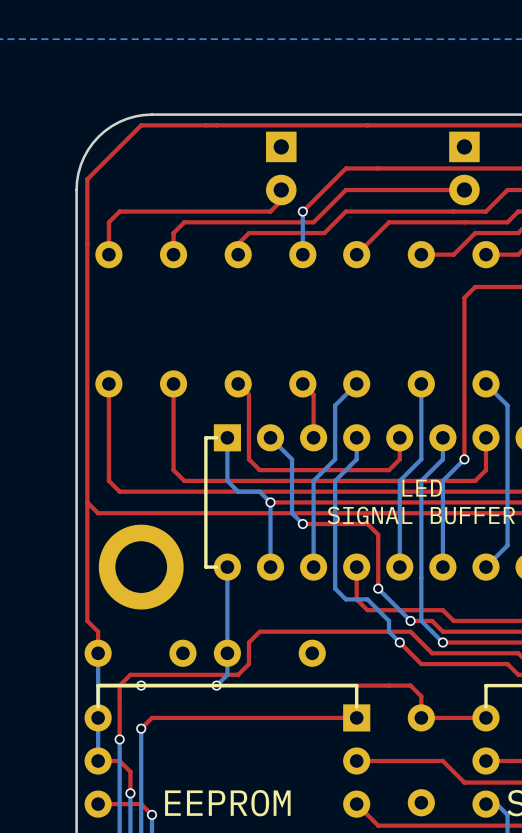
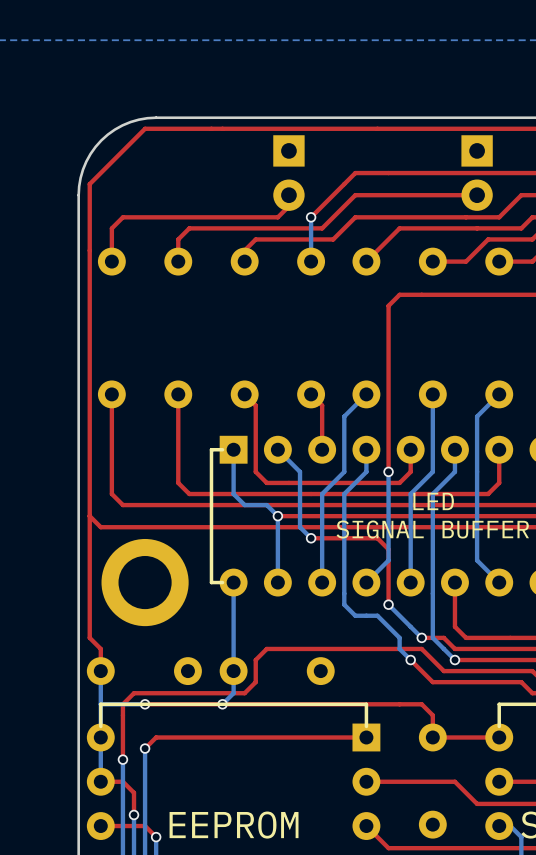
top track: (475, 286) (464, 297) (464, 459) -> (488, 294) (399, 294) (388, 305) (388, 471)
bottom track: (485, 383) (507, 405) (507, 545) (485, 567) -> (499, 394) (477, 416) (477, 560) (499, 582)
bottom track: none -> (388, 471) (388, 560) (366, 582)
bottom track: (464, 459) (442, 480) (442, 567) -> none
via position: (464, 459) -> (388, 471)
top track: (356, 567) (356, 599) (367, 610) (442, 610) -> (454, 582) (454, 626)

